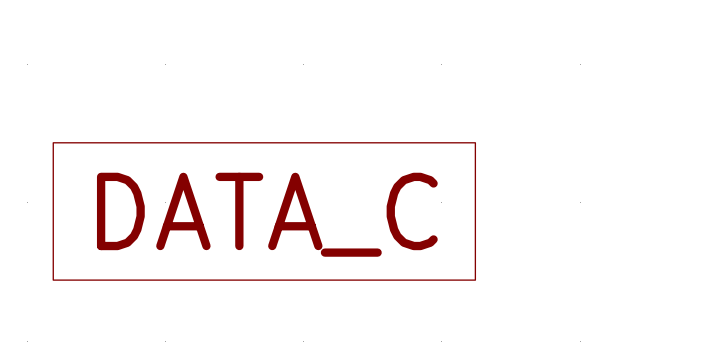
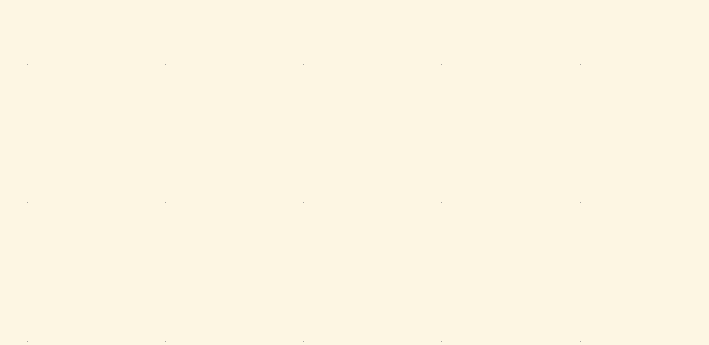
global label: DATA_C (267, 214) -> none

